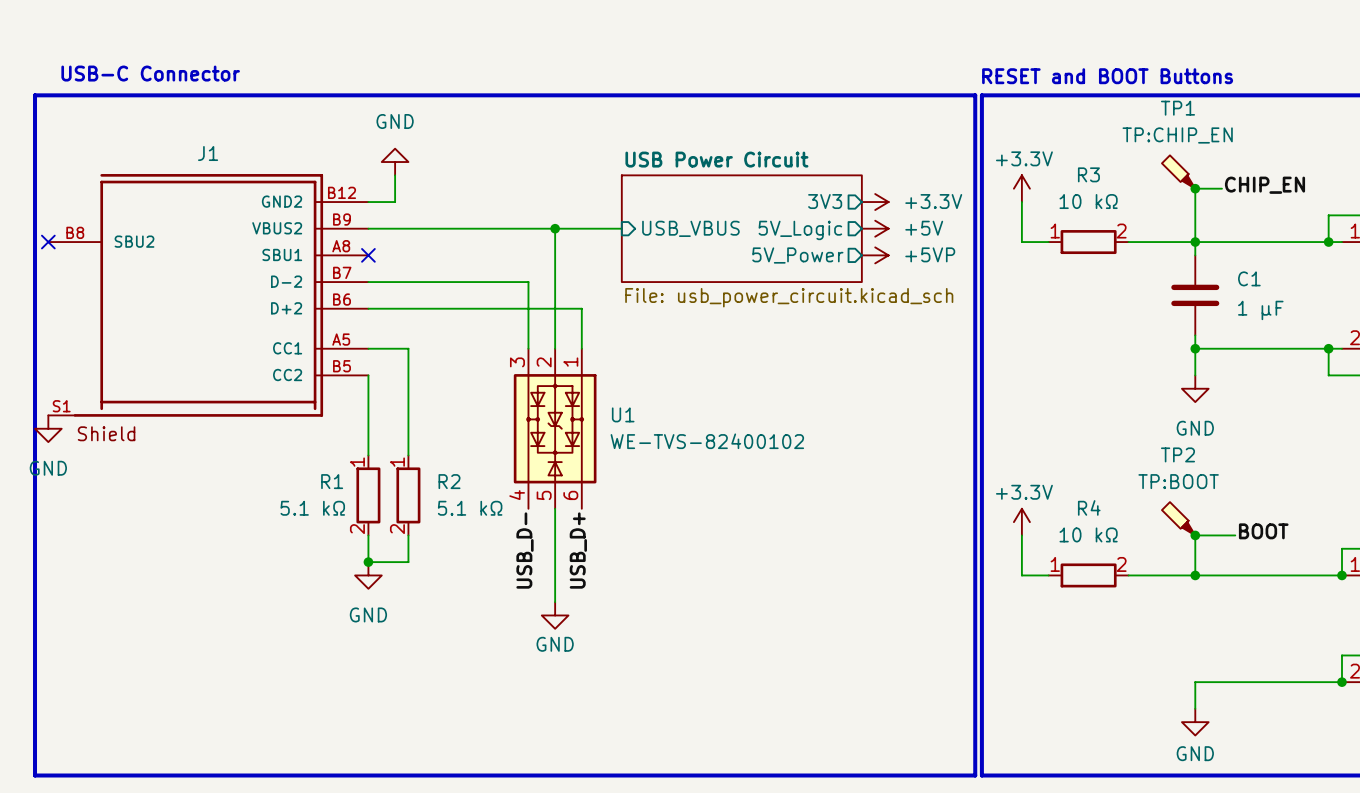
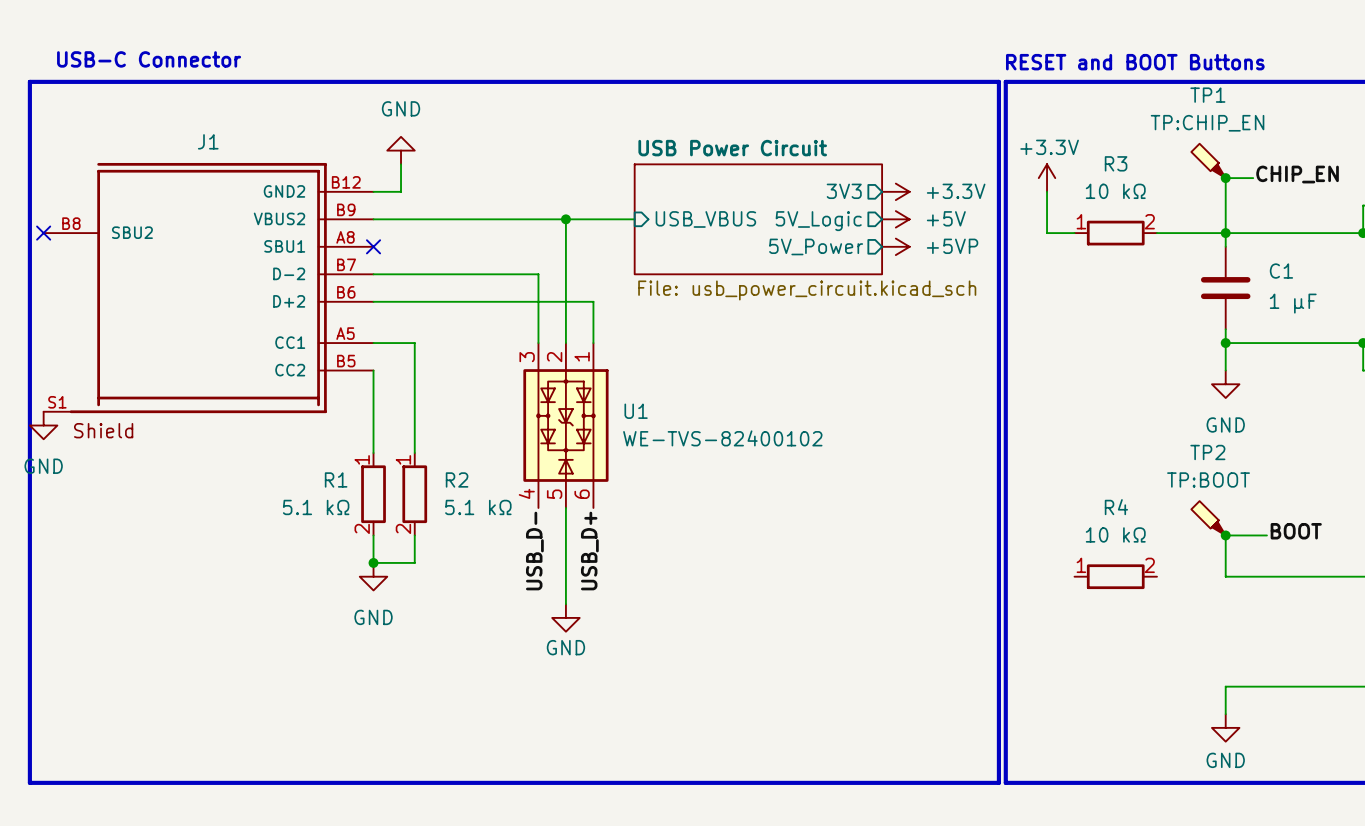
power symbol: +3.3V (1021, 522) -> none
wire: (1021, 535) (1021, 575) (1048, 575) -> none
wire: (1128, 575) (1195, 575) -> none
junction: (1195, 575) -> none

